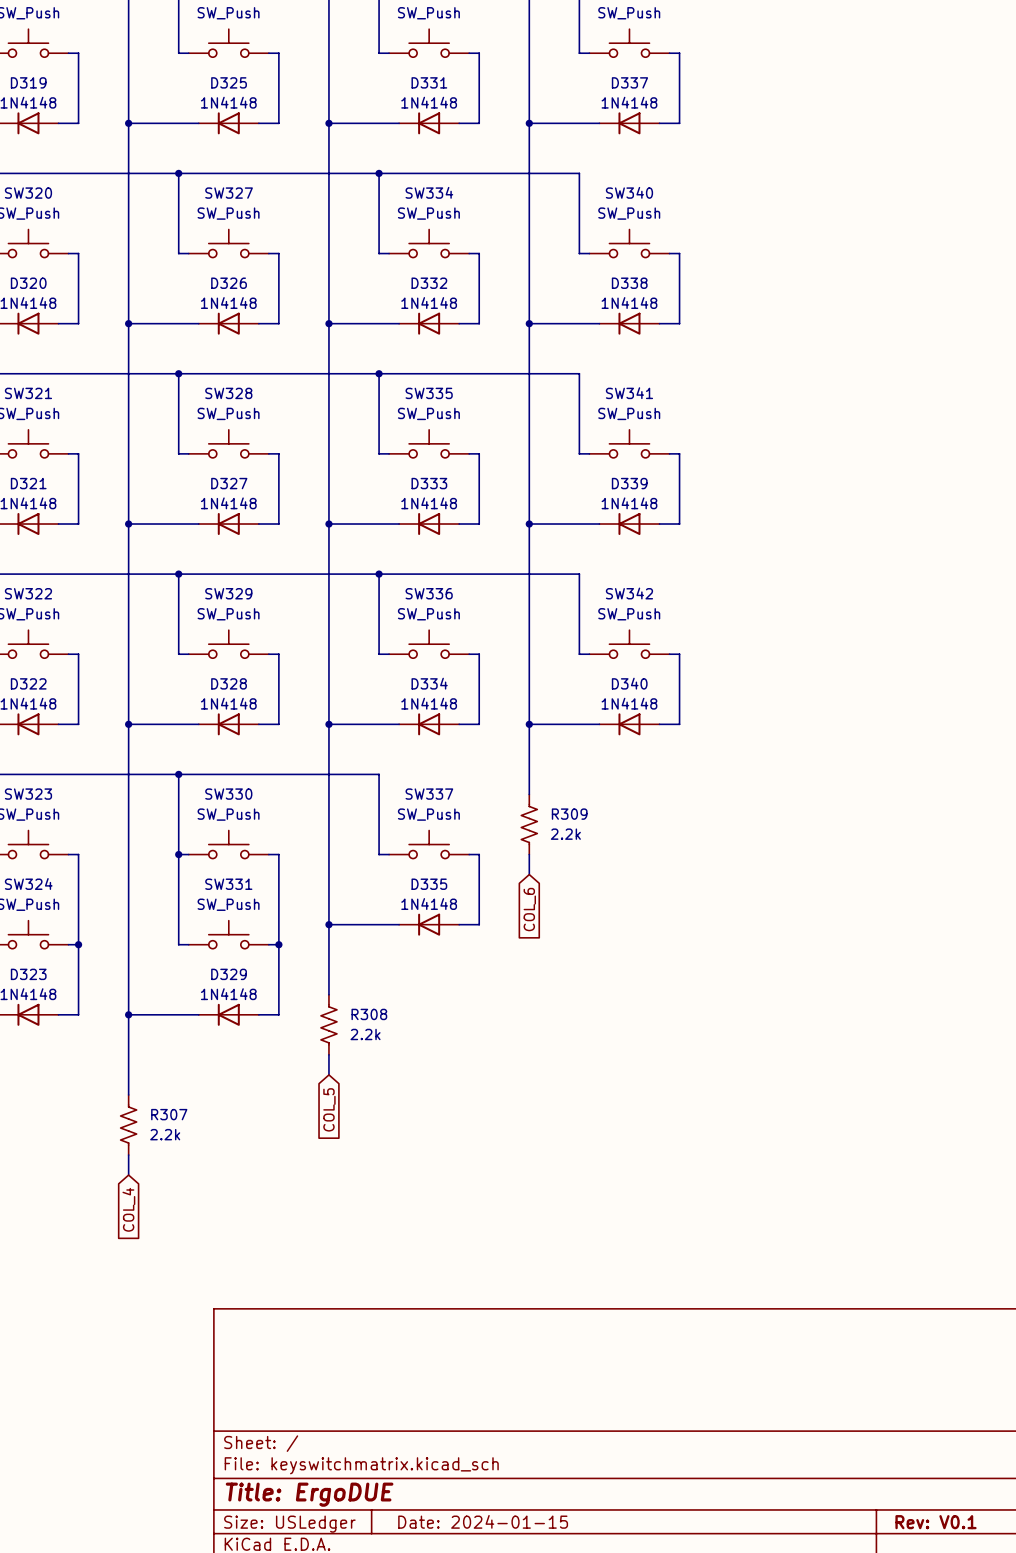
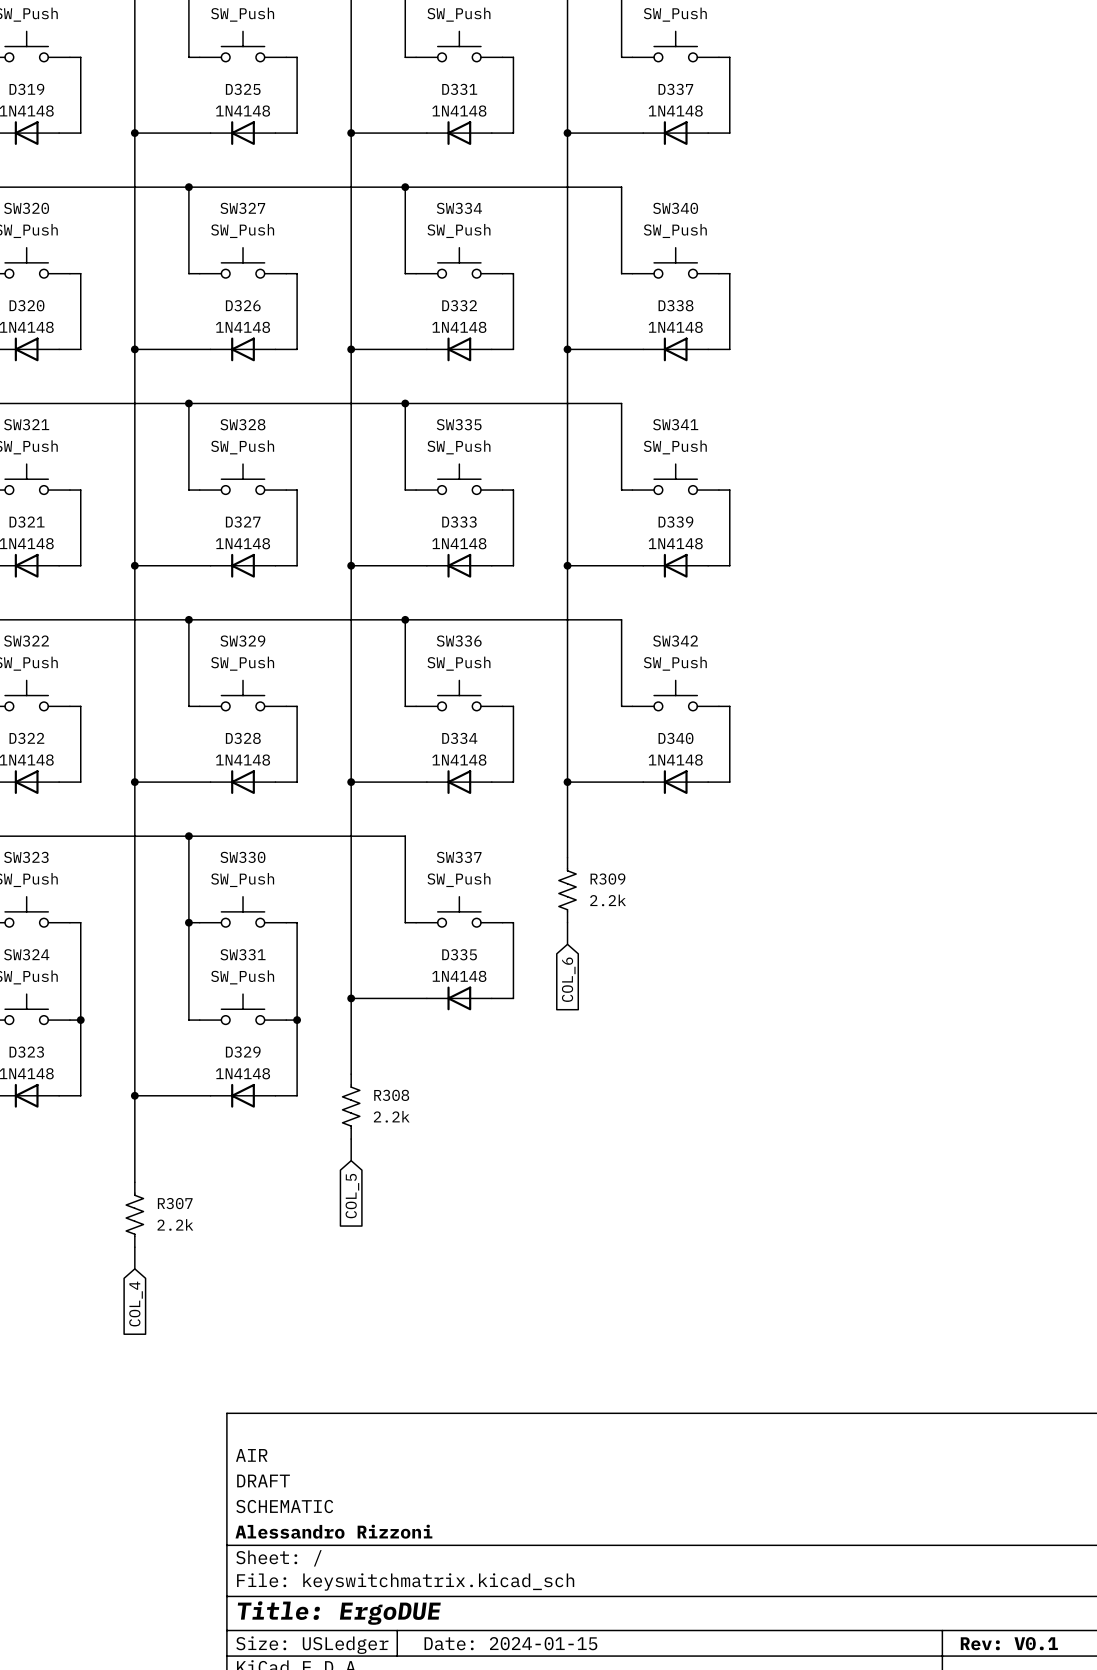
title block: none -> AIR (251, 1455)
title block: none -> DRAFT (263, 1480)
title block: none -> SCHEMATIC (284, 1506)
title block: none -> Alessandro Rizzoni (333, 1531)

